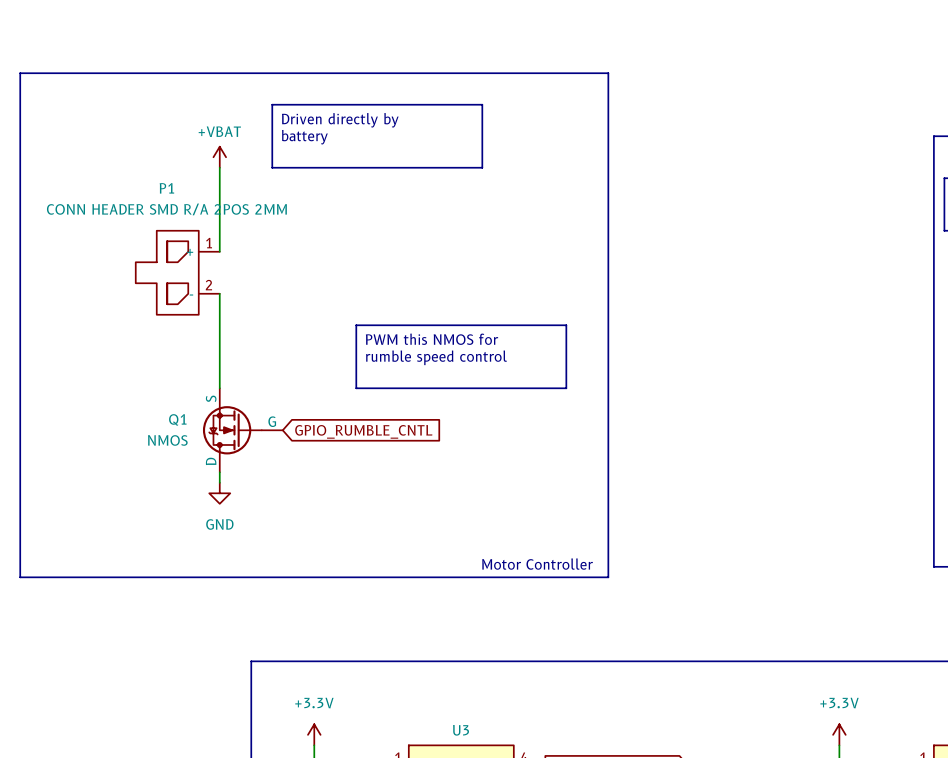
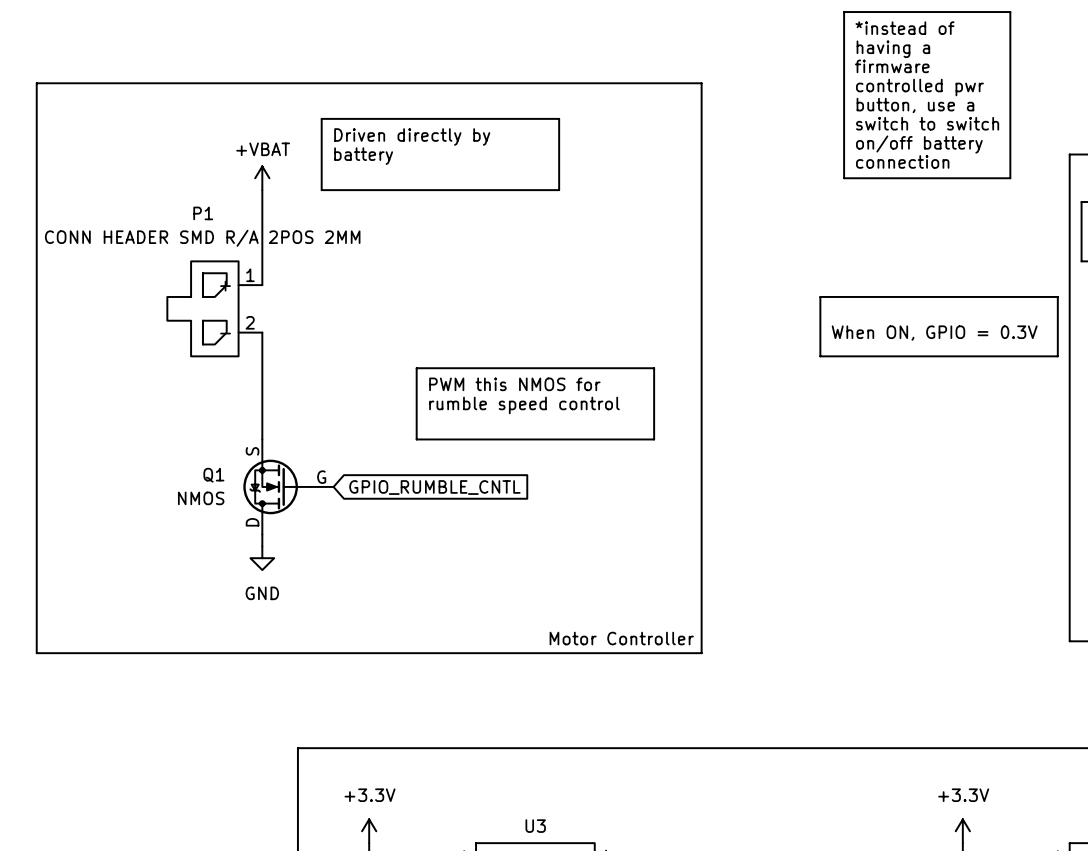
line: none -> (844, 12) (1010, 12) (1010, 178) (844, 178) (844, 12)
text: none -> *instead of (904, 28)
text: none -> having a (893, 49)
text: none -> firmware (892, 66)
text: none -> controlled pwr (919, 87)
text: none -> button, use a (915, 105)
text: none -> switch to switch (927, 123)
text: none -> on/off battery (919, 144)
text: none -> connection (902, 161)
line: none -> (820, 296) (1057, 296) (1057, 356) (820, 356) (820, 296)
text: none -> When ON, GPIO = 0.3V (934, 333)

